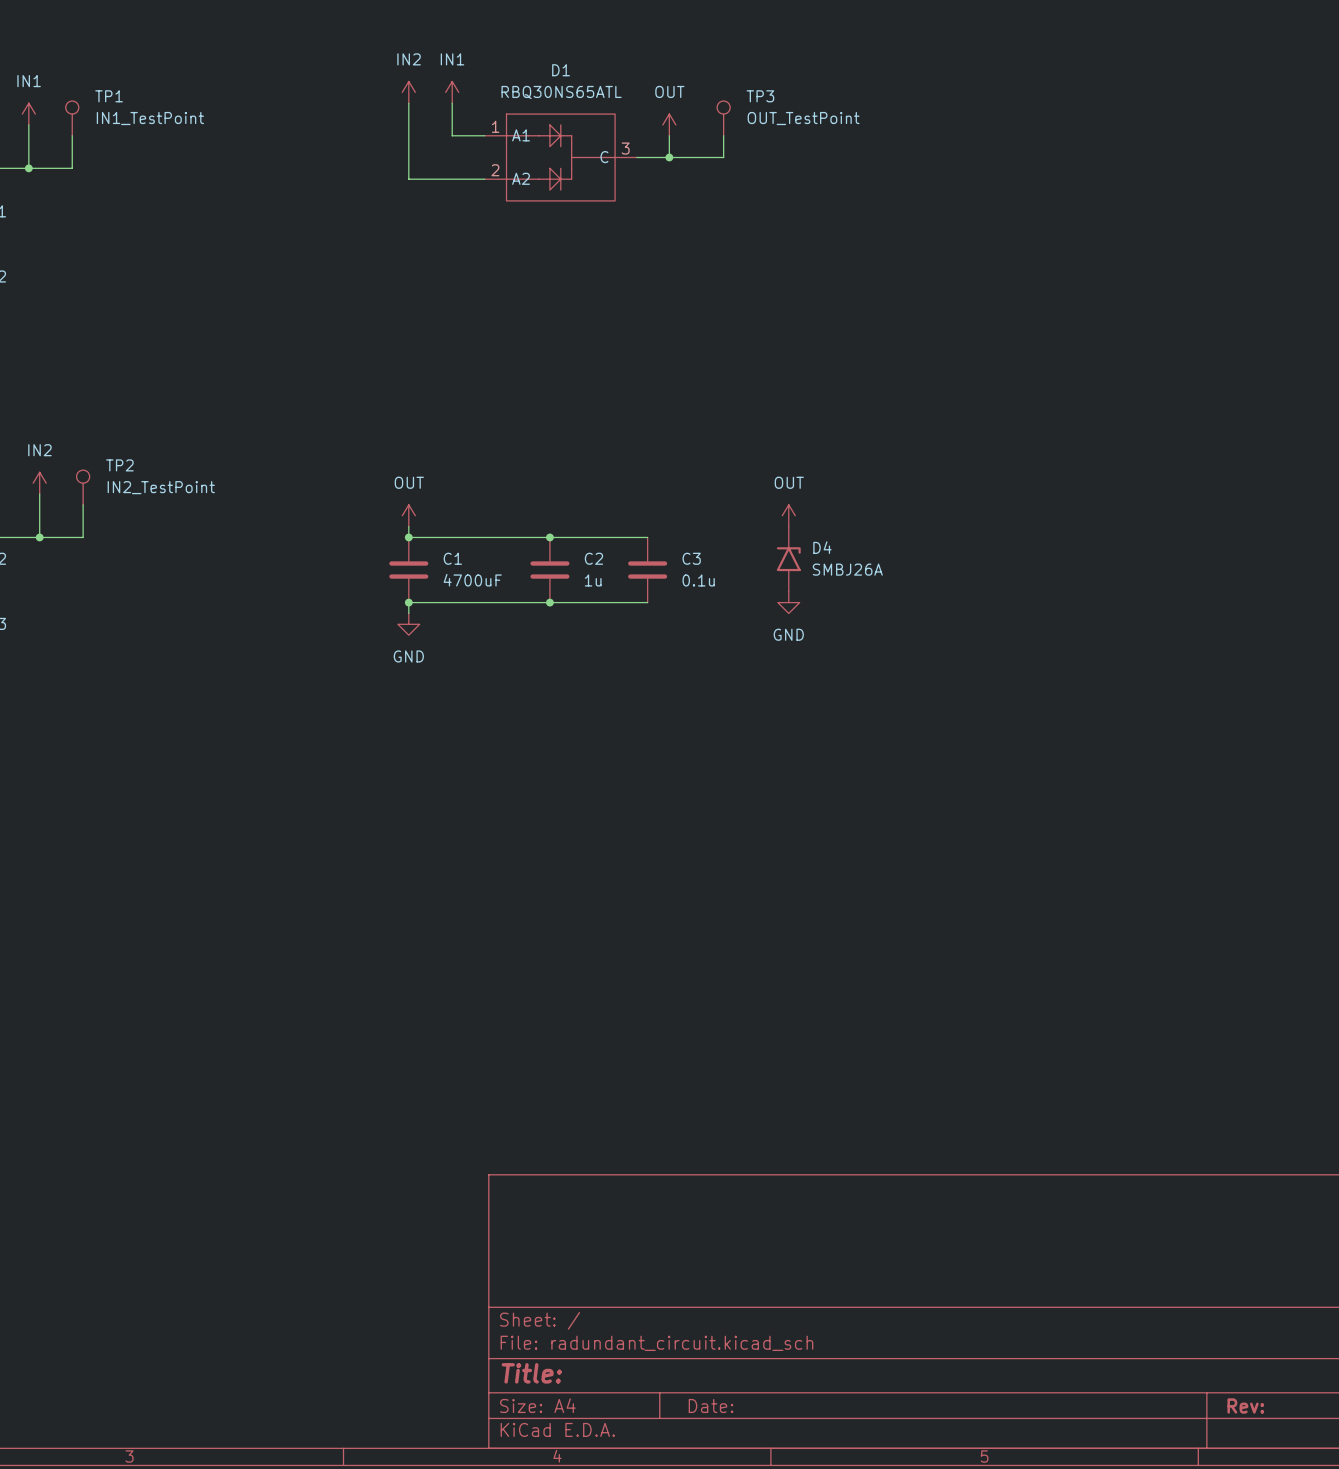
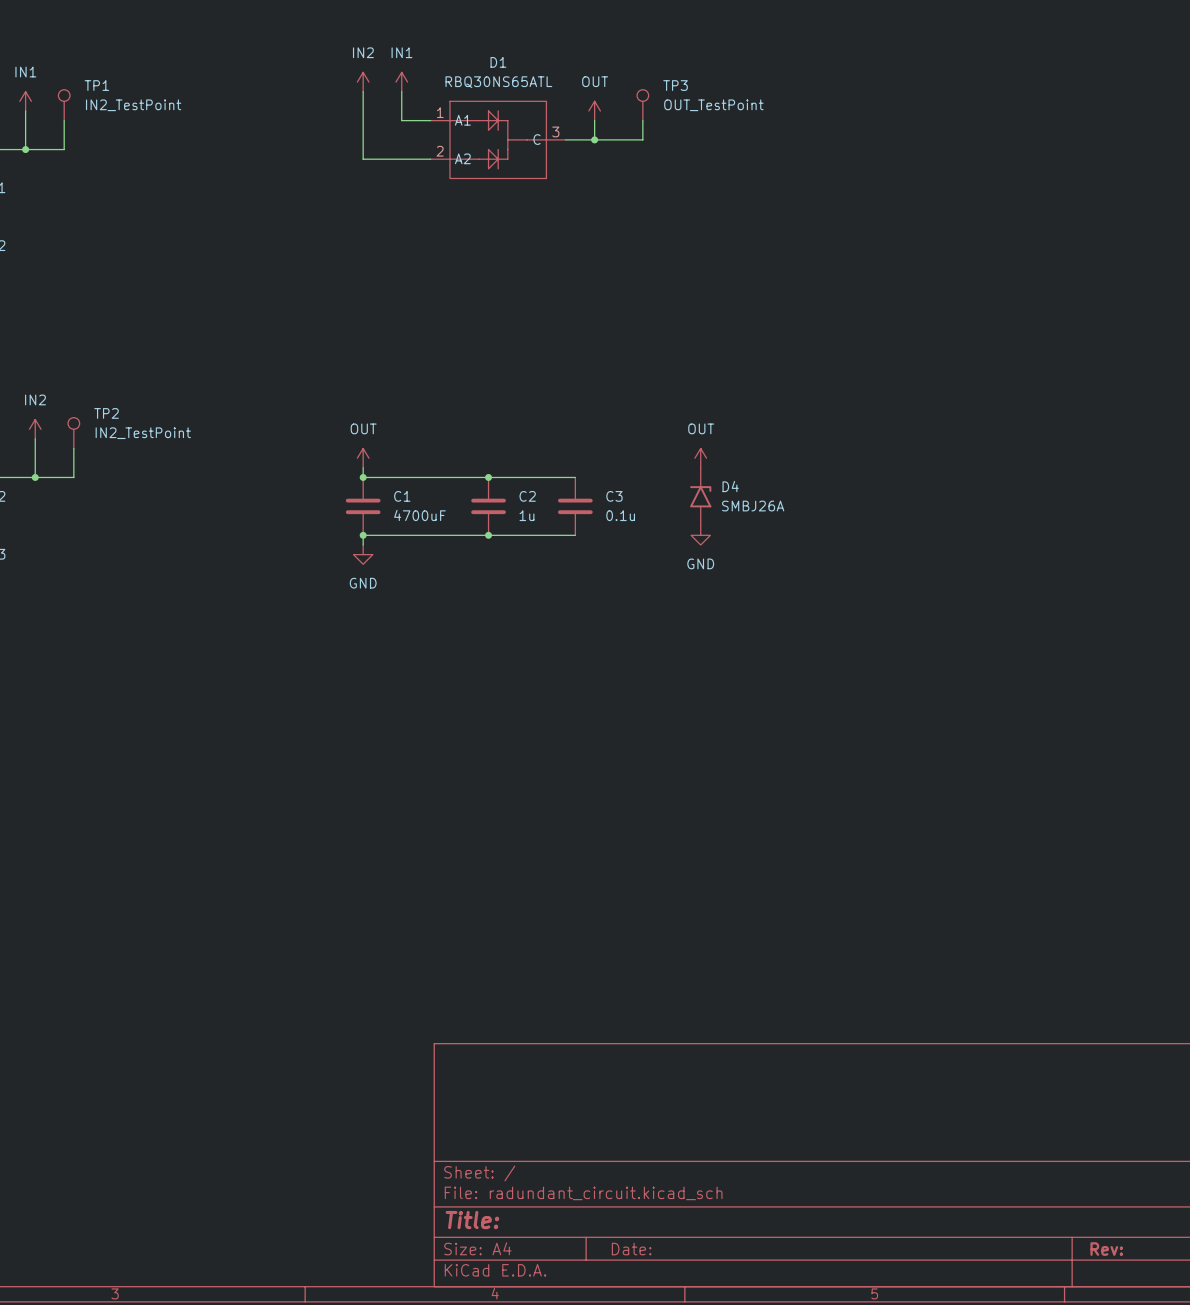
TP1 value: IN1_TestPoint (150, 118) -> IN2_TestPoint (133, 105)

